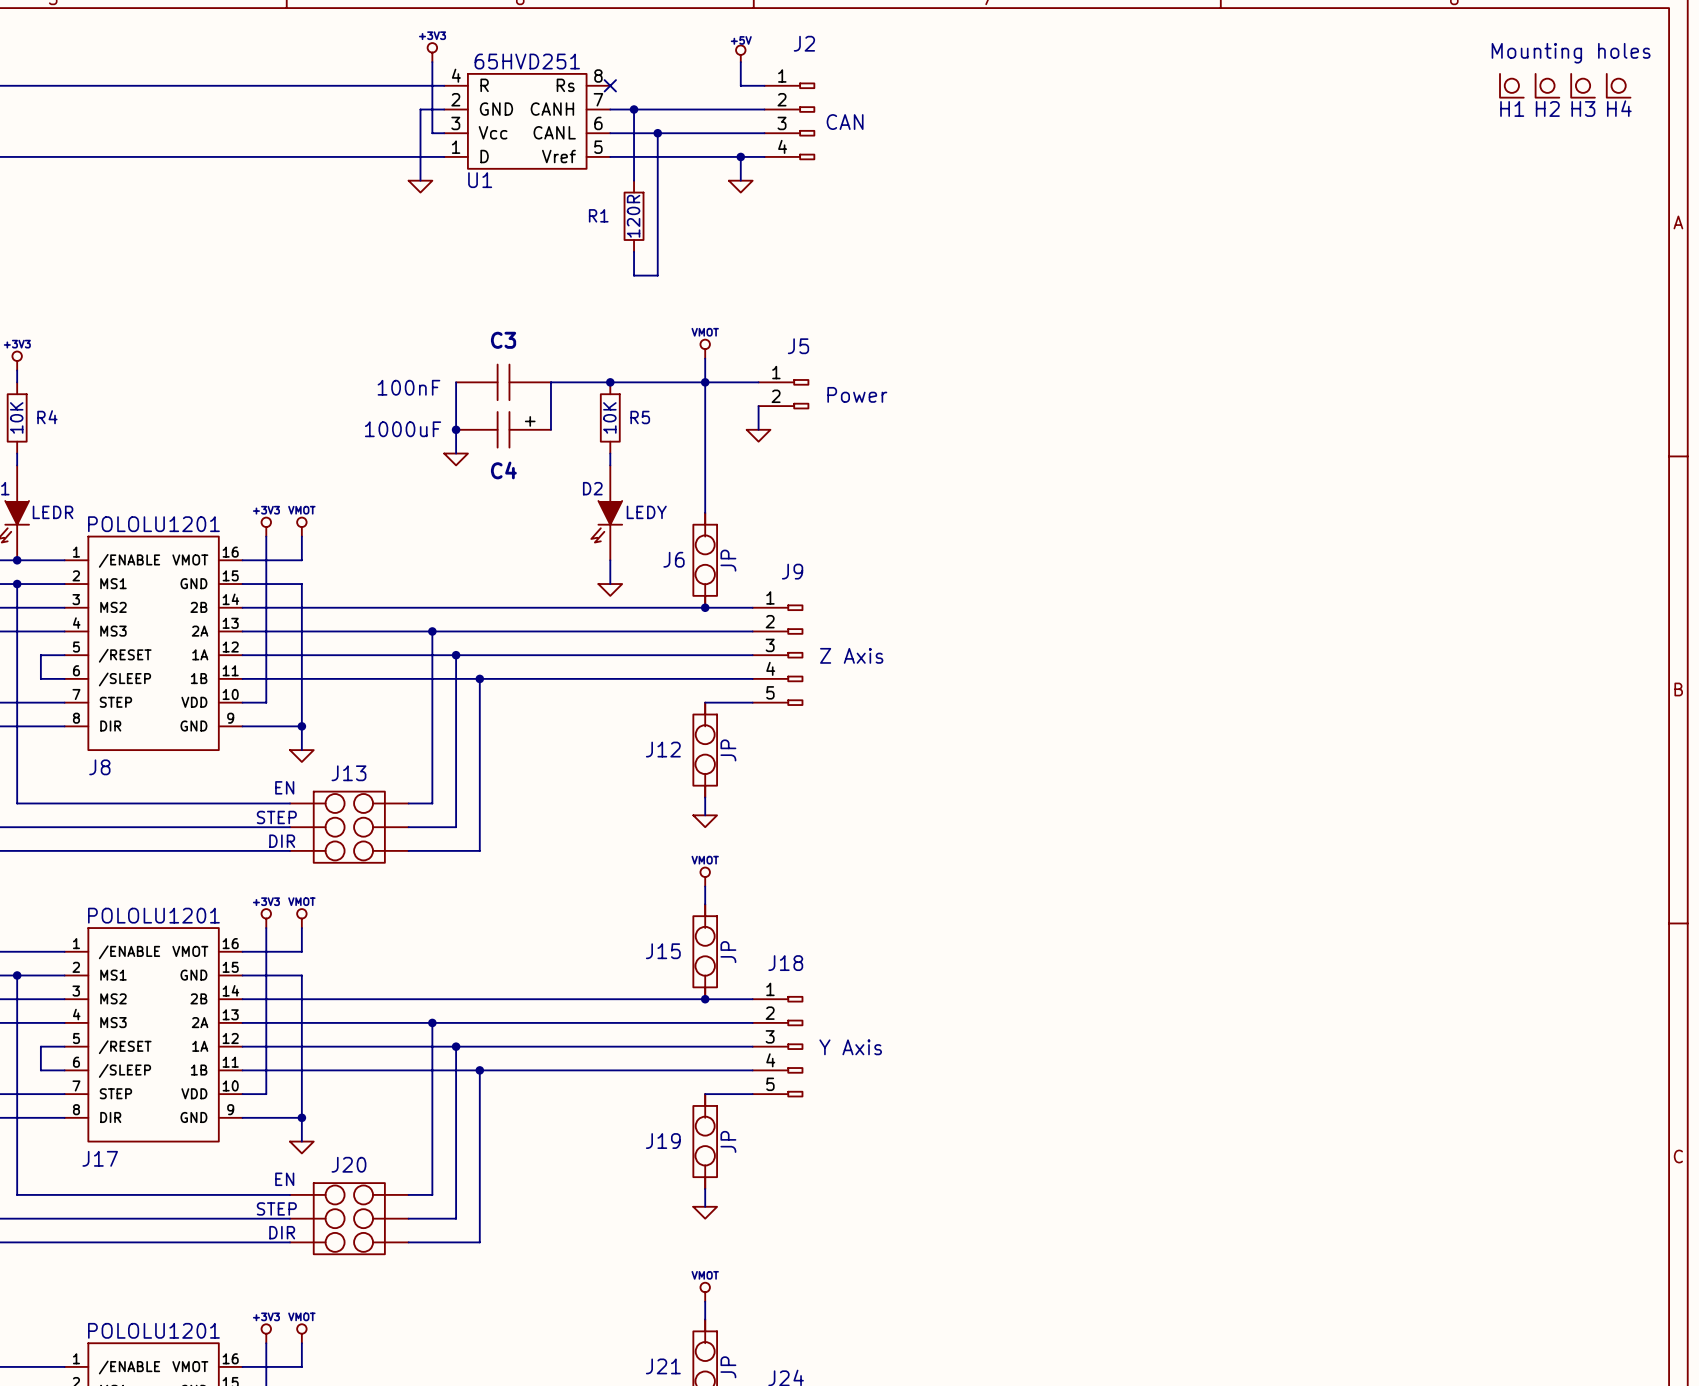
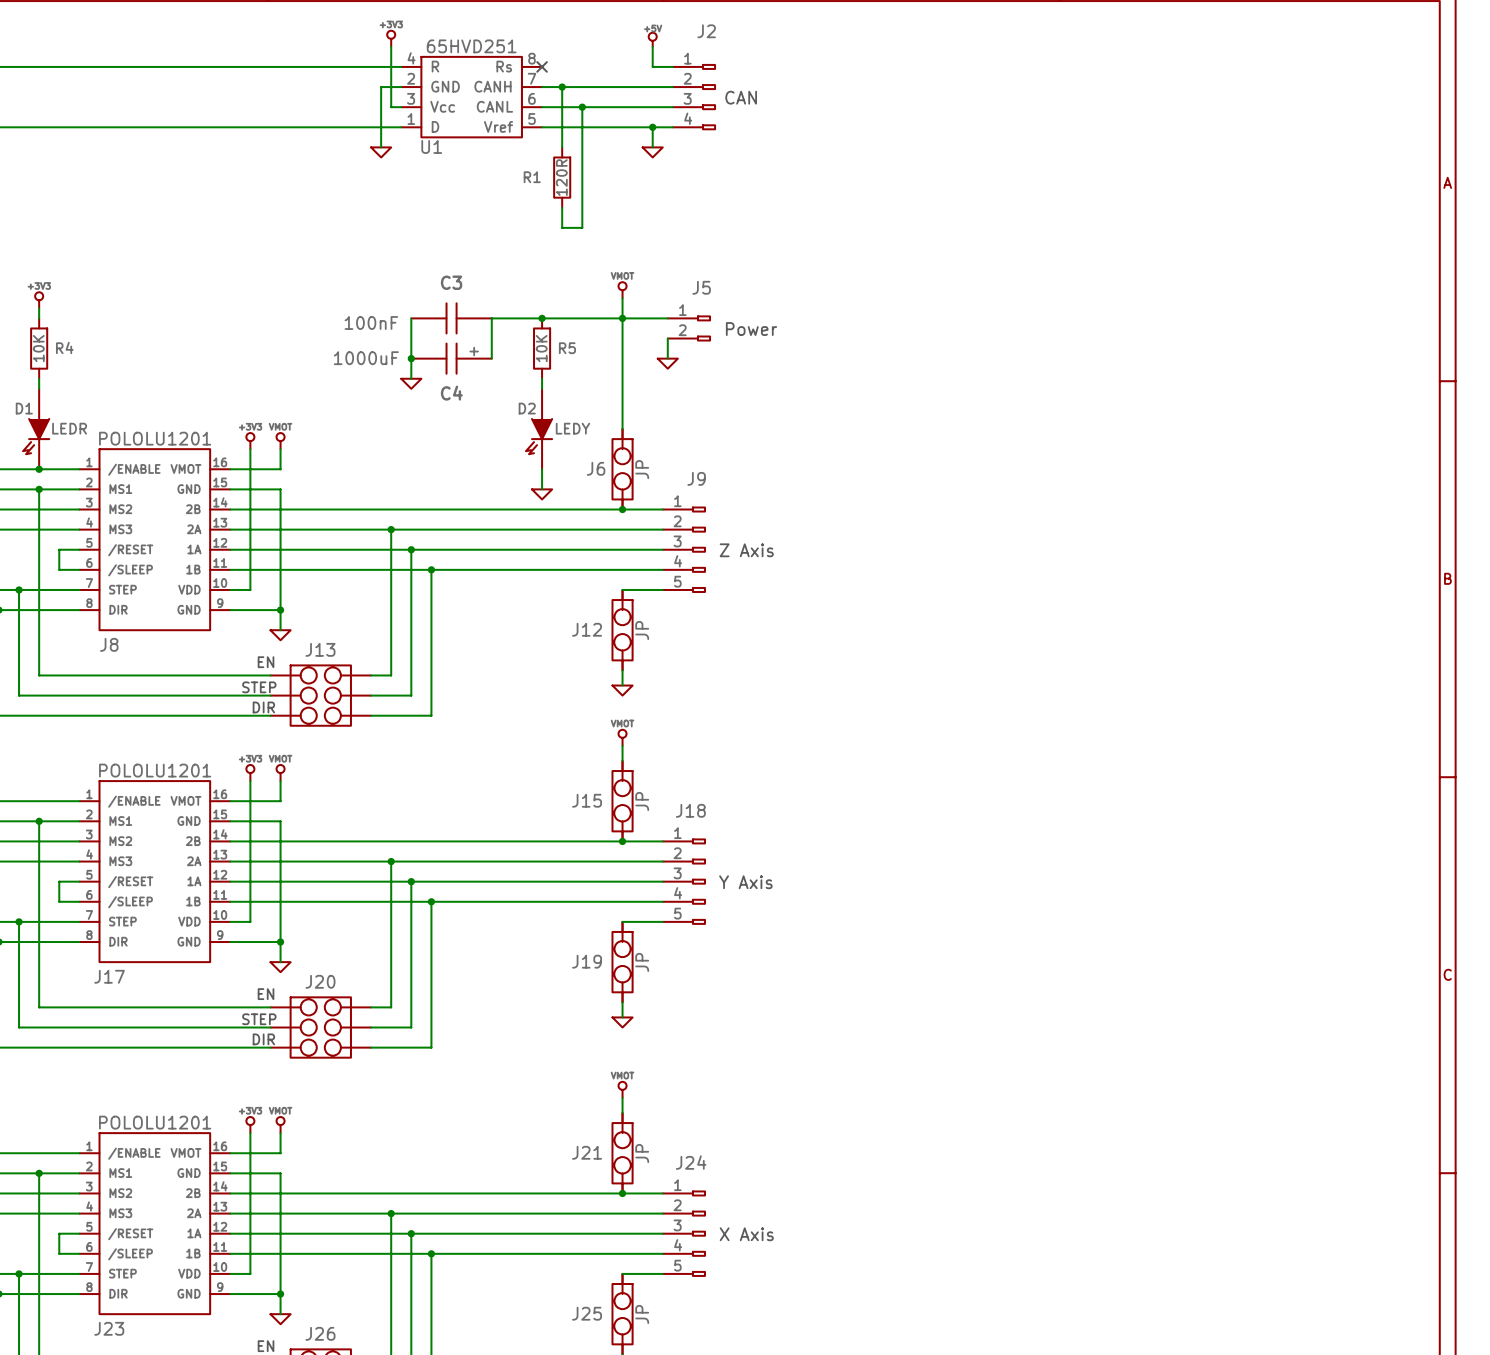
text: Mounting holes (1571, 53) -> none
H1: (1511, 85) -> none
H2: (1547, 85) -> none
H3: (1583, 85) -> none
H4: (1618, 85) -> none

